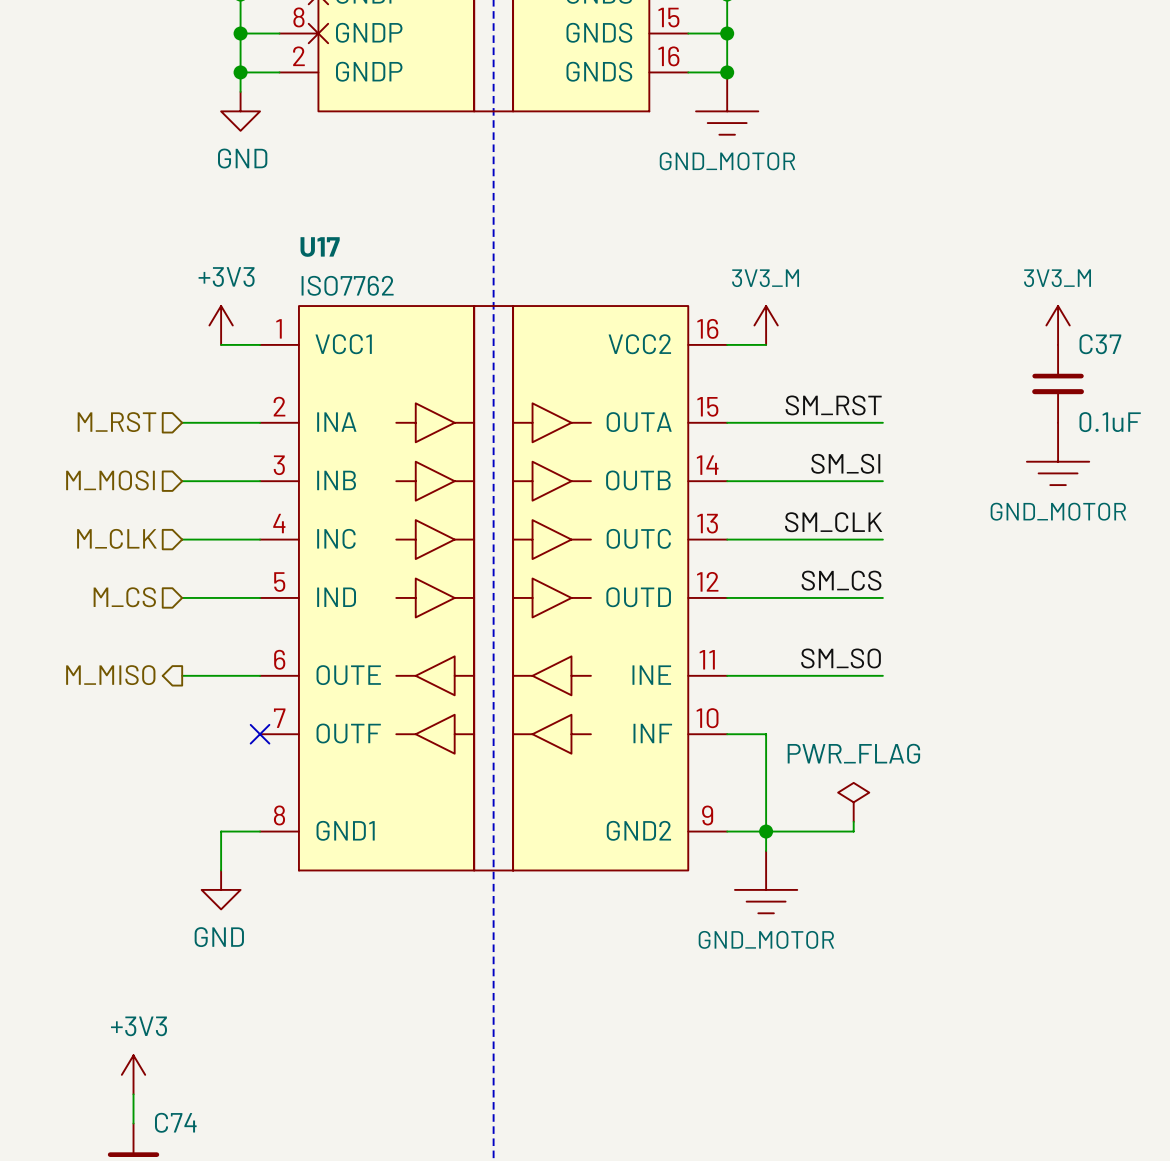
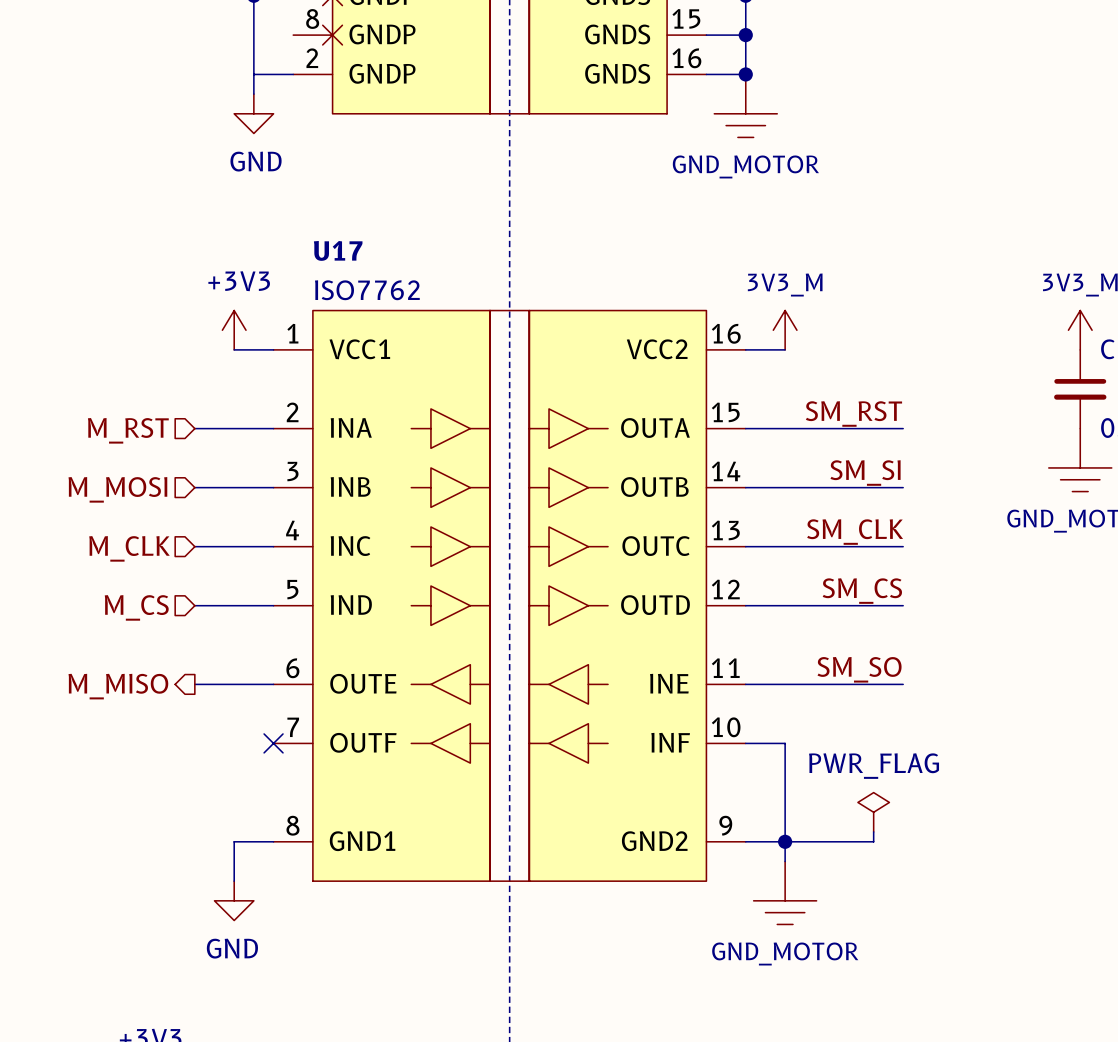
wire: (240, 33) (279, 33) -> none
junction: (240, 33) -> none
junction: (240, 72) -> none

